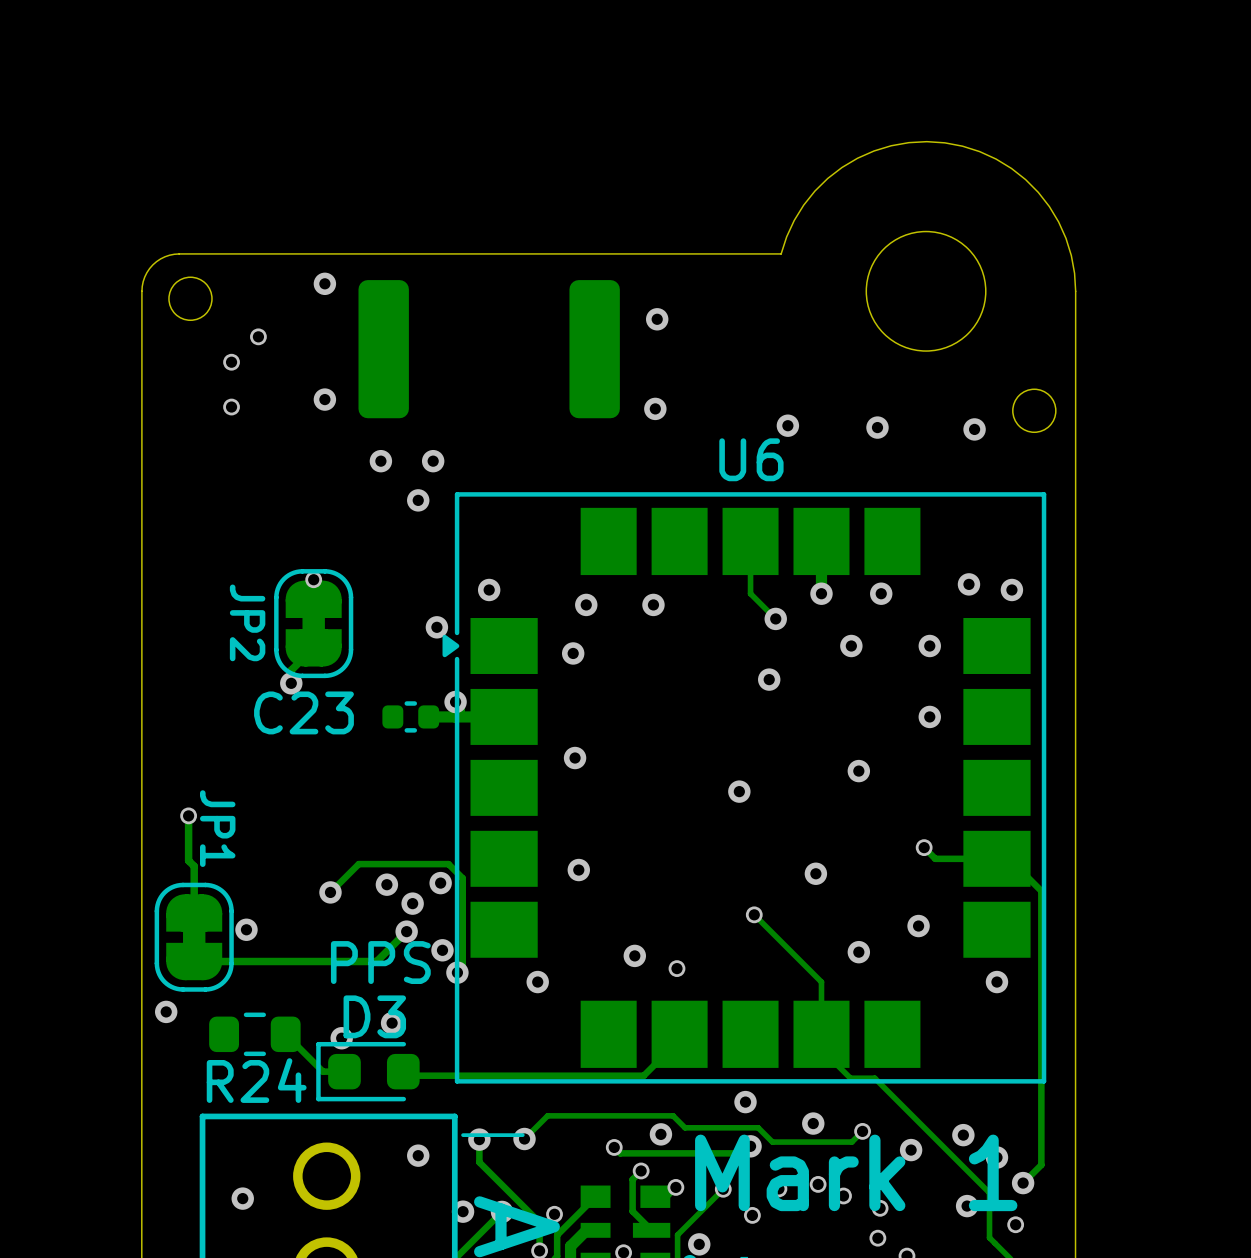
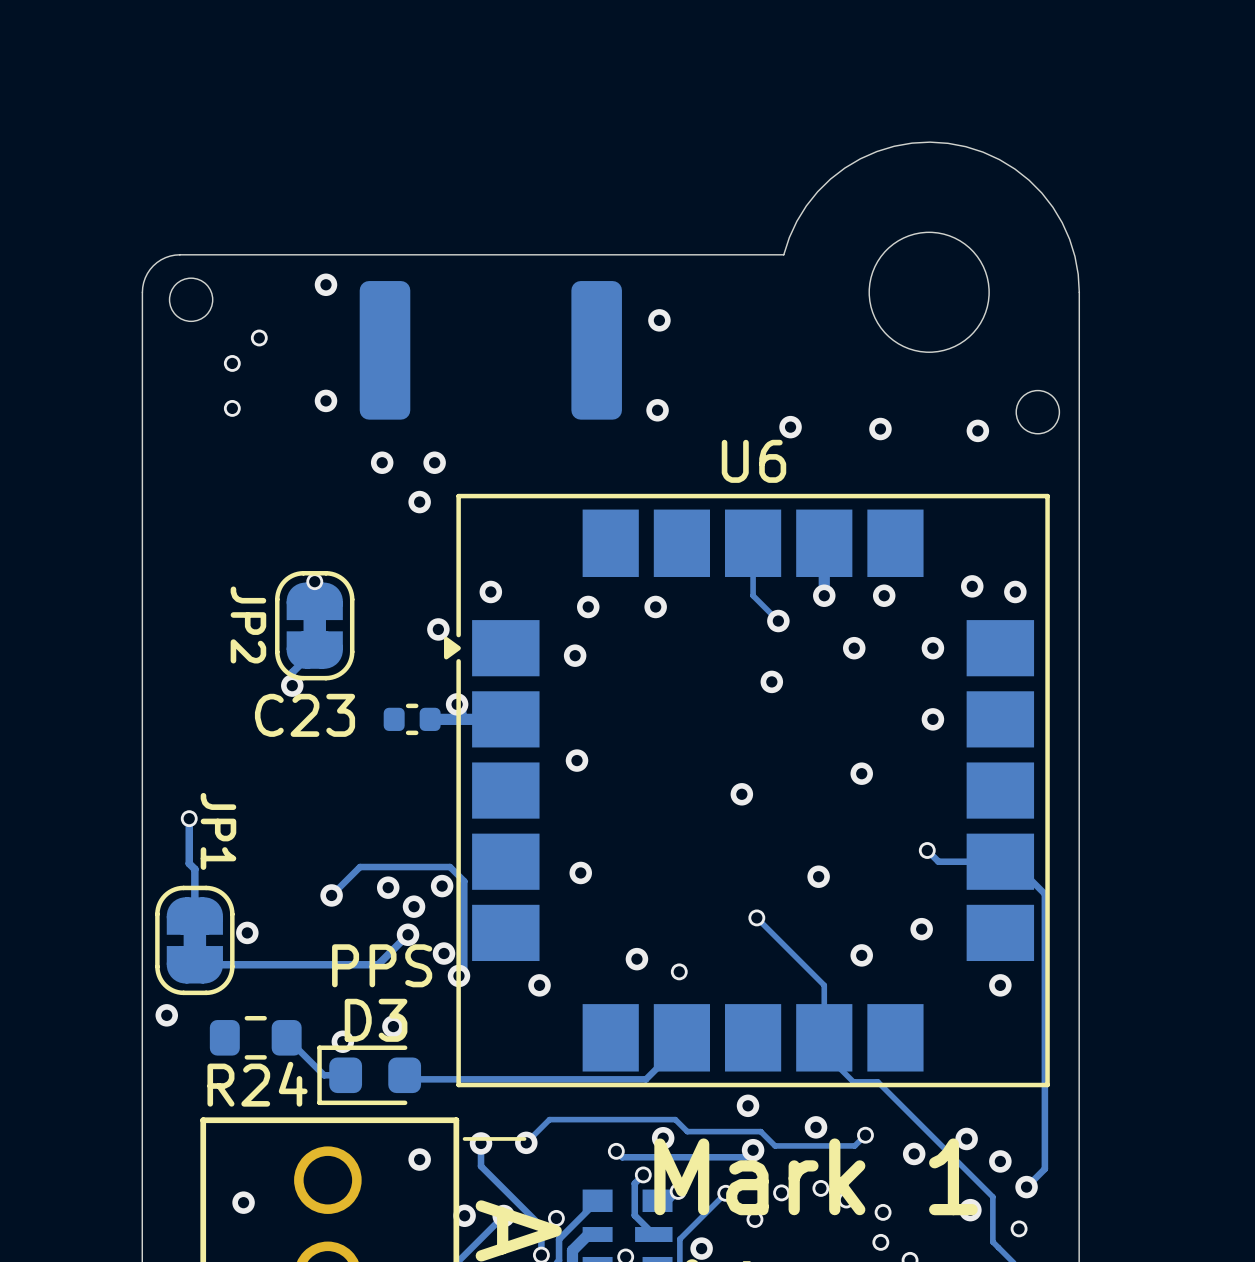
text position: Mark 1 (856, 1172) -> Mark 1 (816, 1176)

